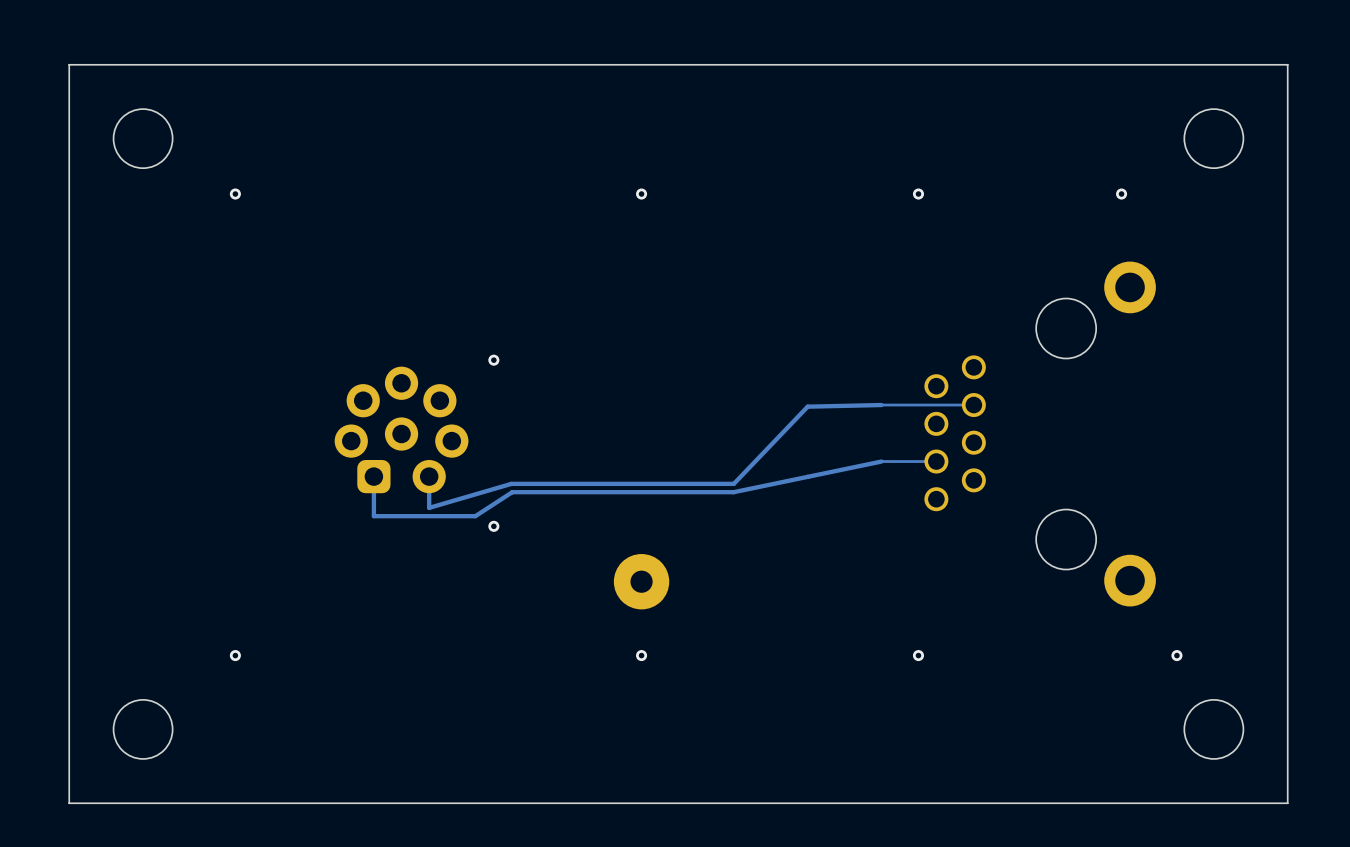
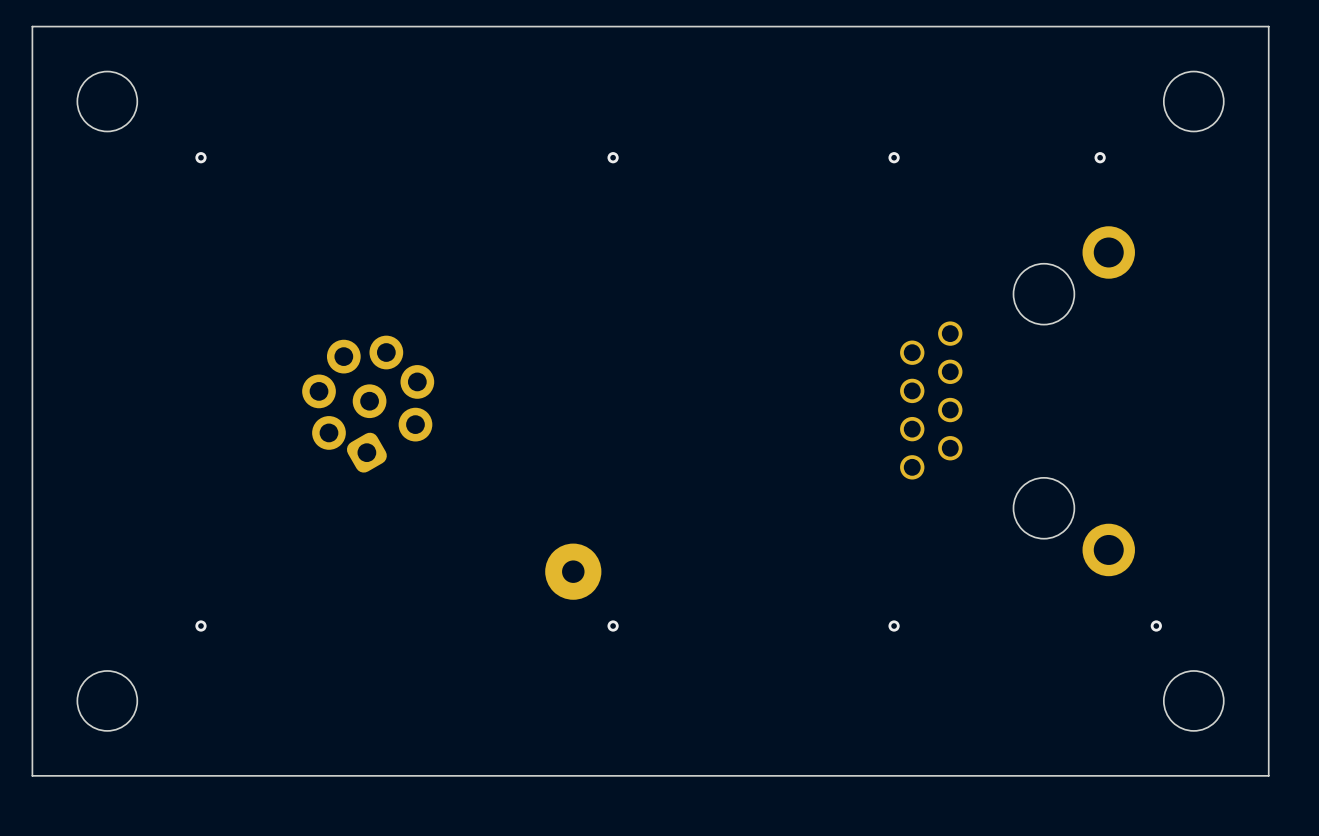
via: (493, 360) -> none
track: (973, 405) (807, 406) (733, 483) (511, 483) (429, 507) (429, 476) -> none
part rotation: 0° (401, 429) -> 30° counterclockwise (368, 404)
track: (936, 461) (881, 461) (733, 492) (512, 492) (475, 516) (373, 516) (373, 476) -> none
via: (493, 526) -> none
part position: (641, 581) -> (573, 571)

